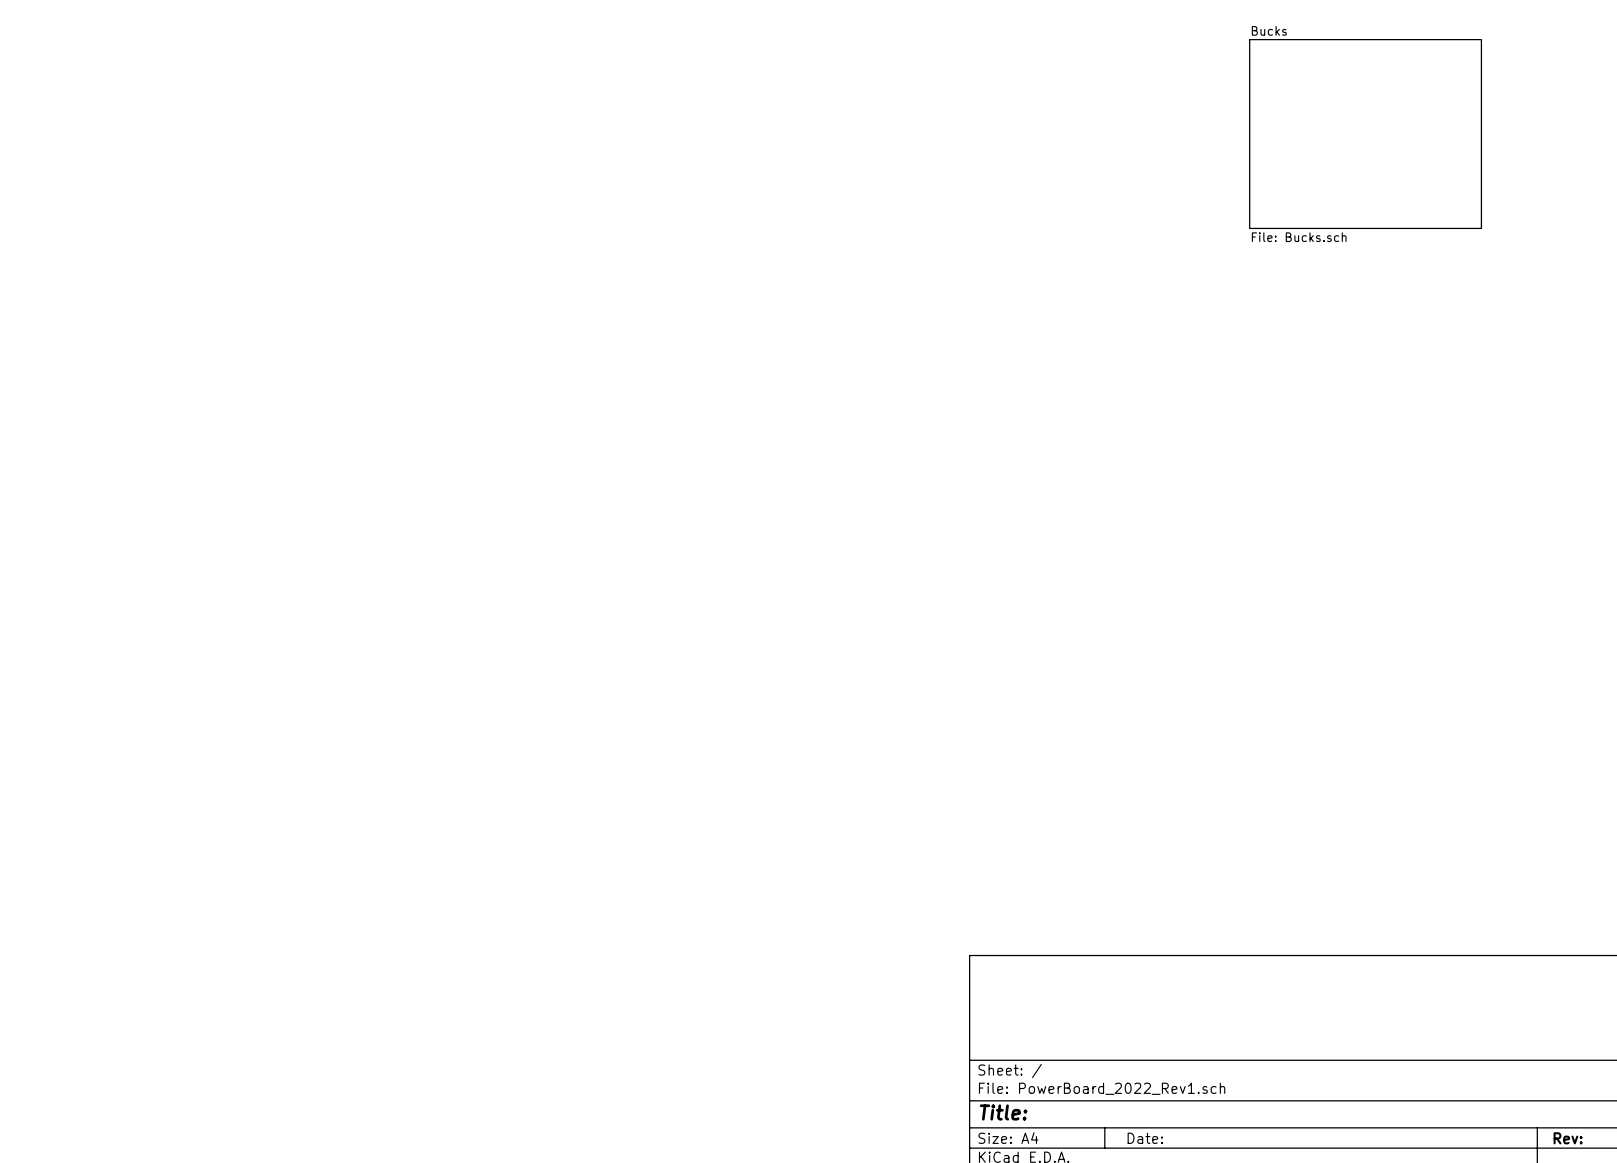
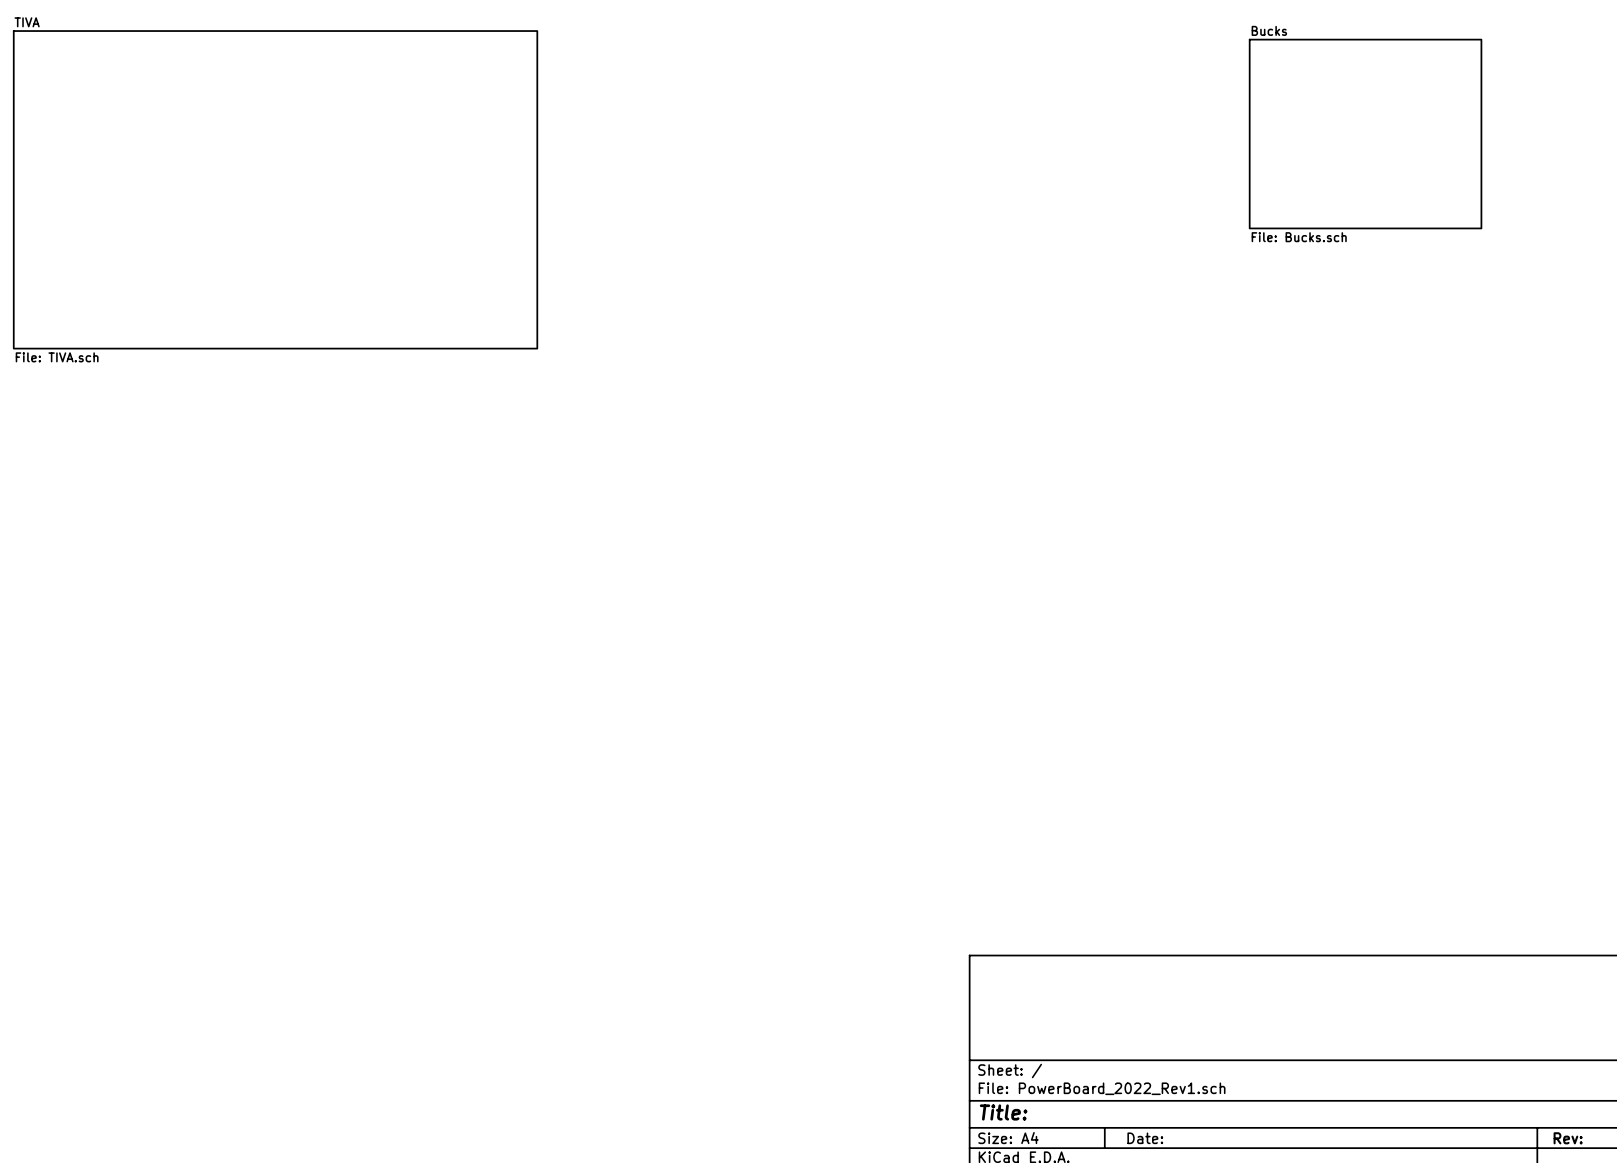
sheet TIVA: none -> File: TIVA.sch (275, 189)

